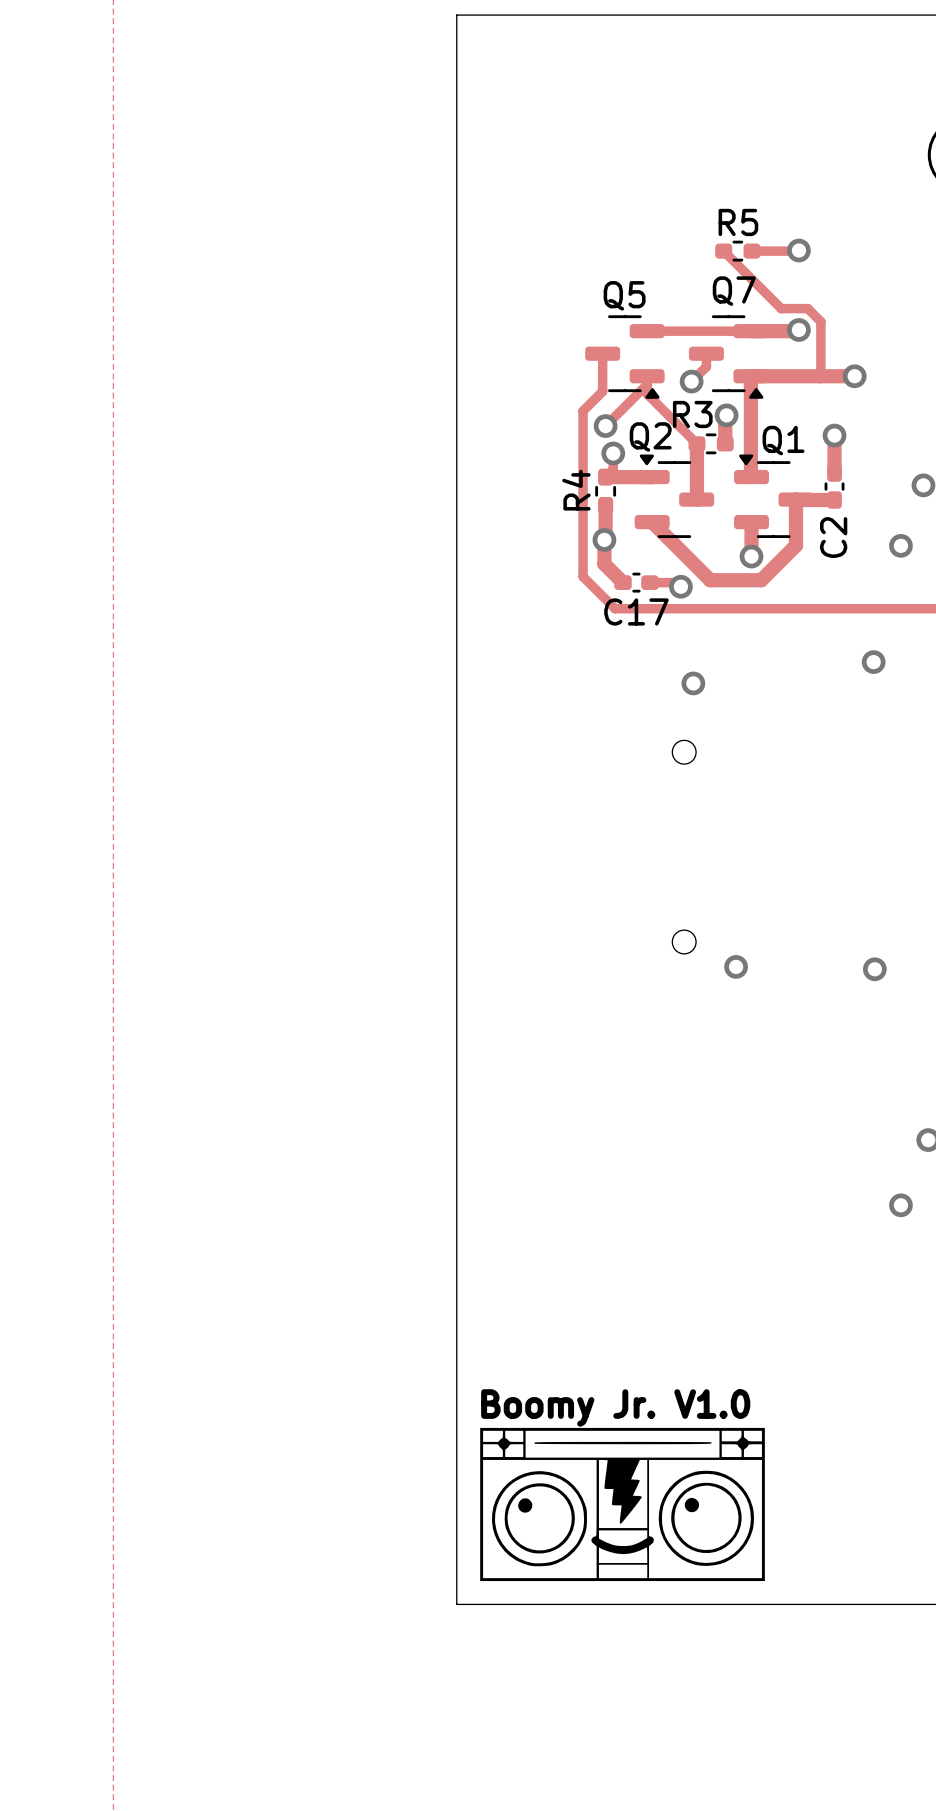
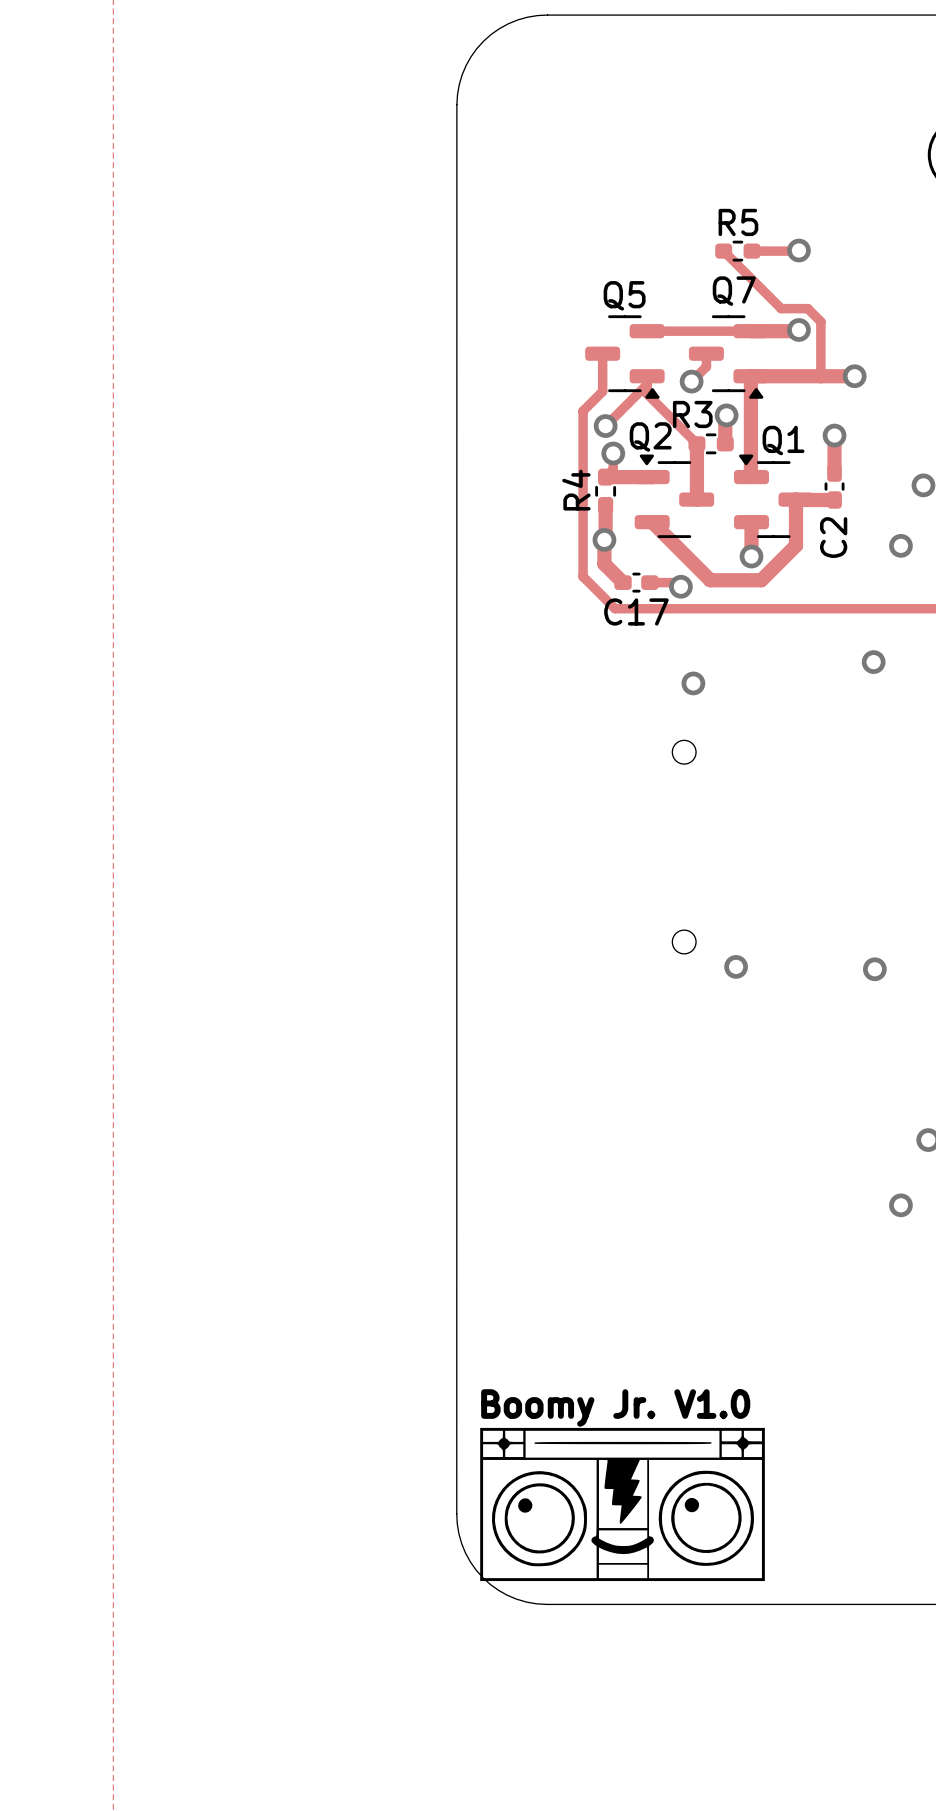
board edge: (547, 15) (456, 15) (456, 1604) (546, 1604) -> (547, 15) (527, 17) (508, 23) (483, 41) (471, 56) (462, 74) (456, 104) (457, 1523) (465, 1552) (482, 1577) (498, 1590) (516, 1599) (546, 1604)

